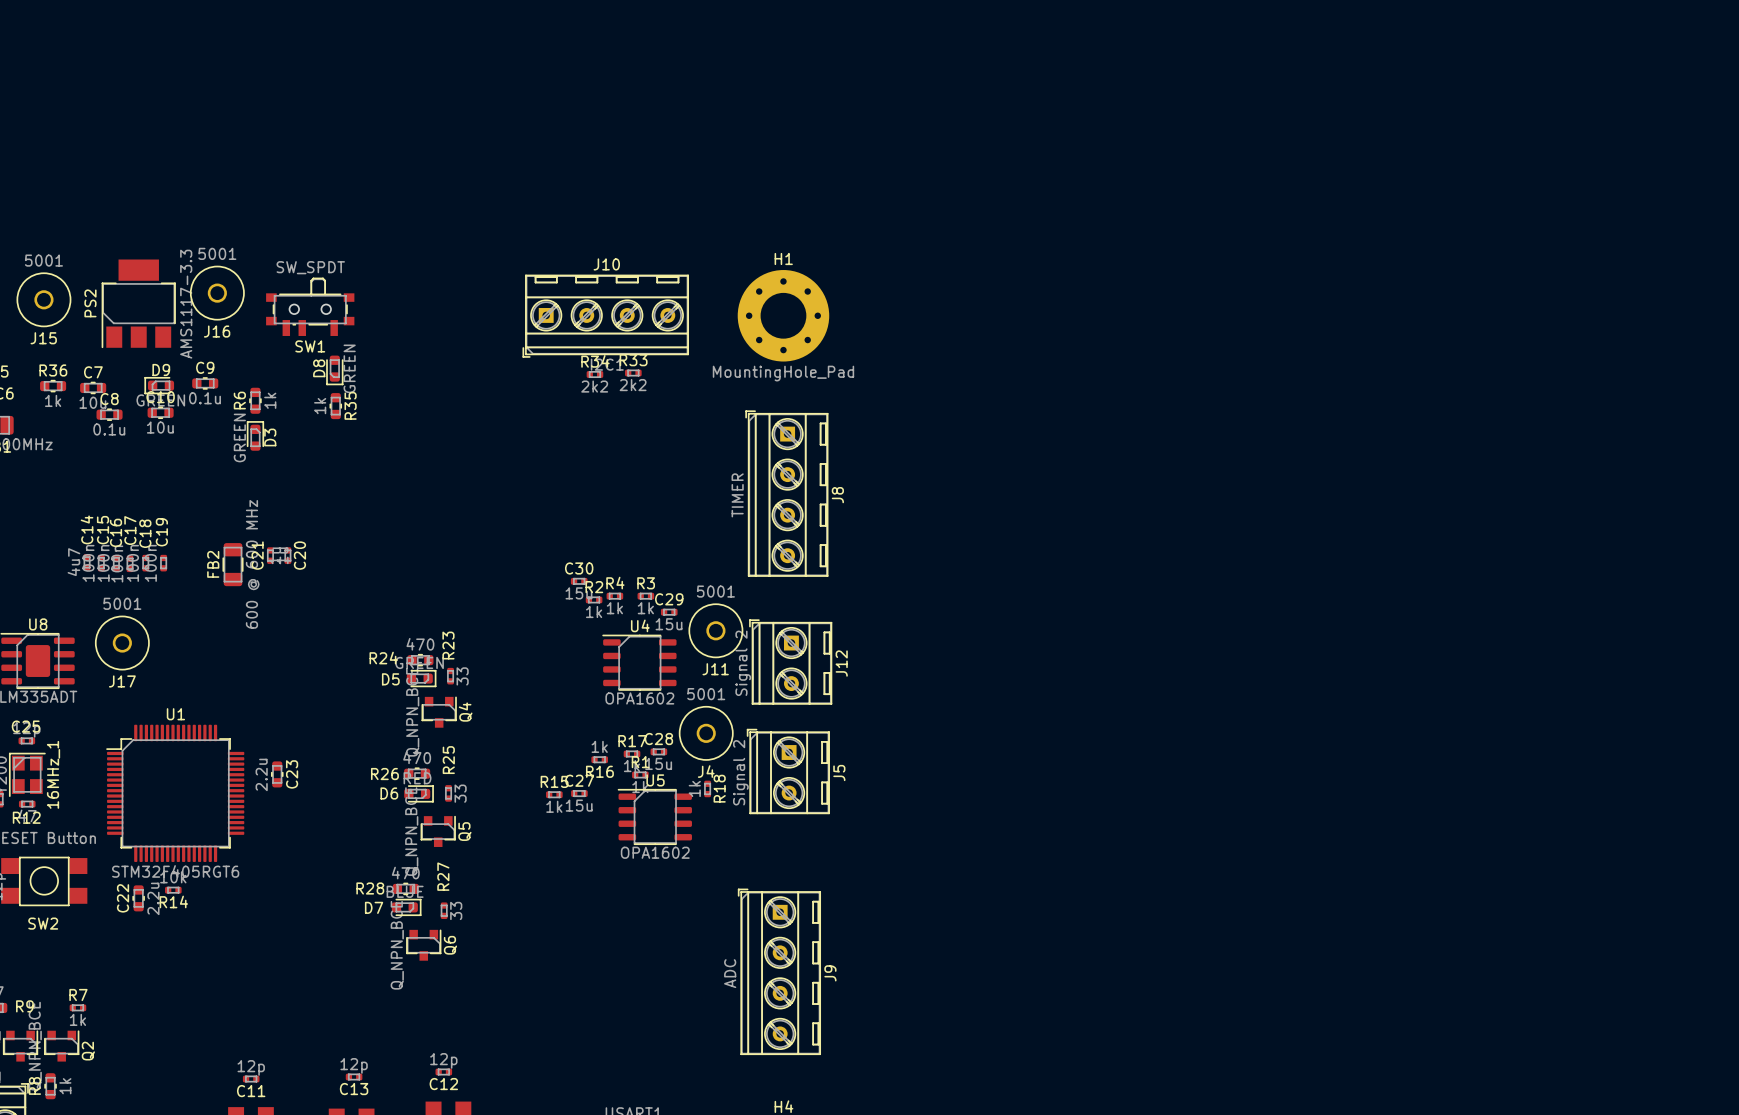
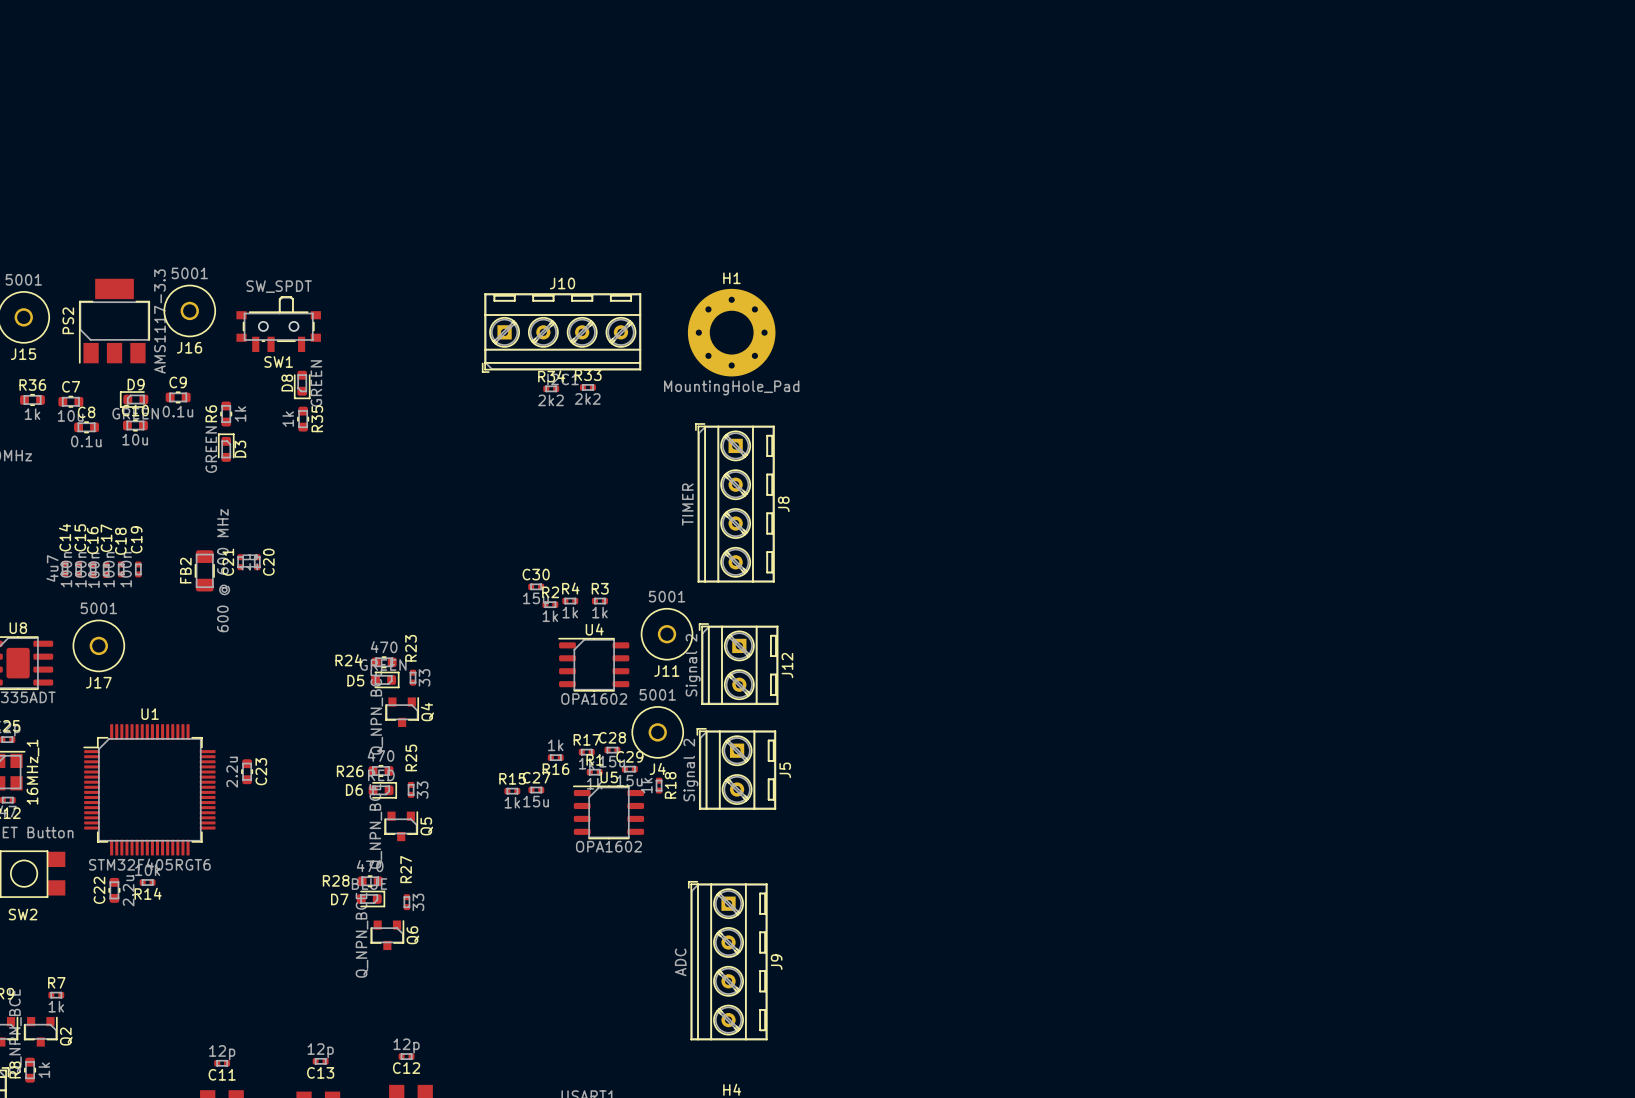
C29 position: (669, 612) -> (629, 769)

